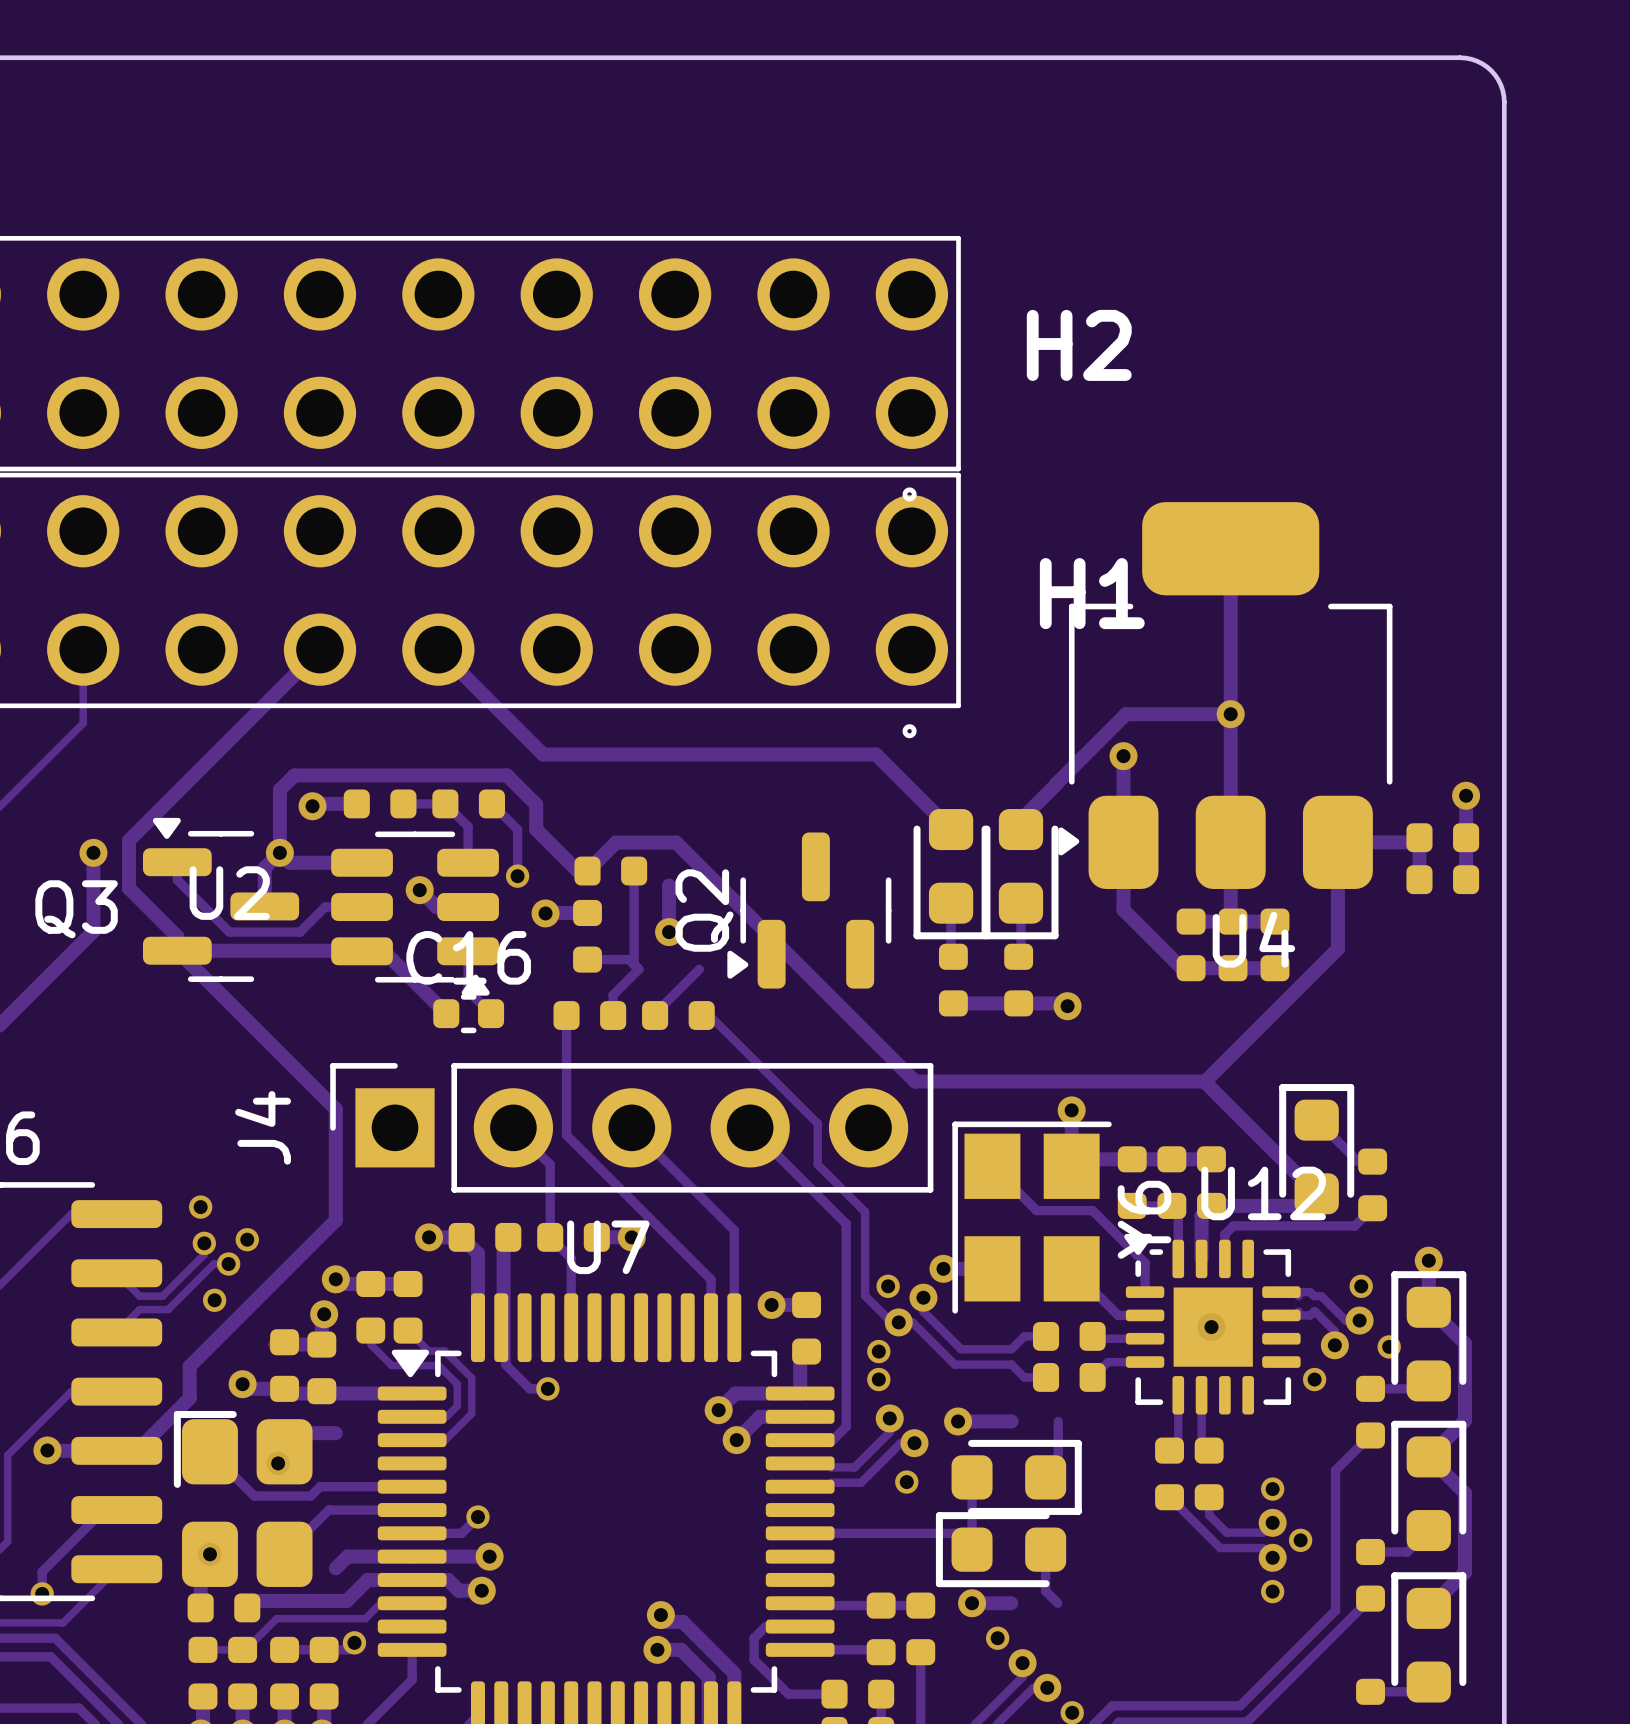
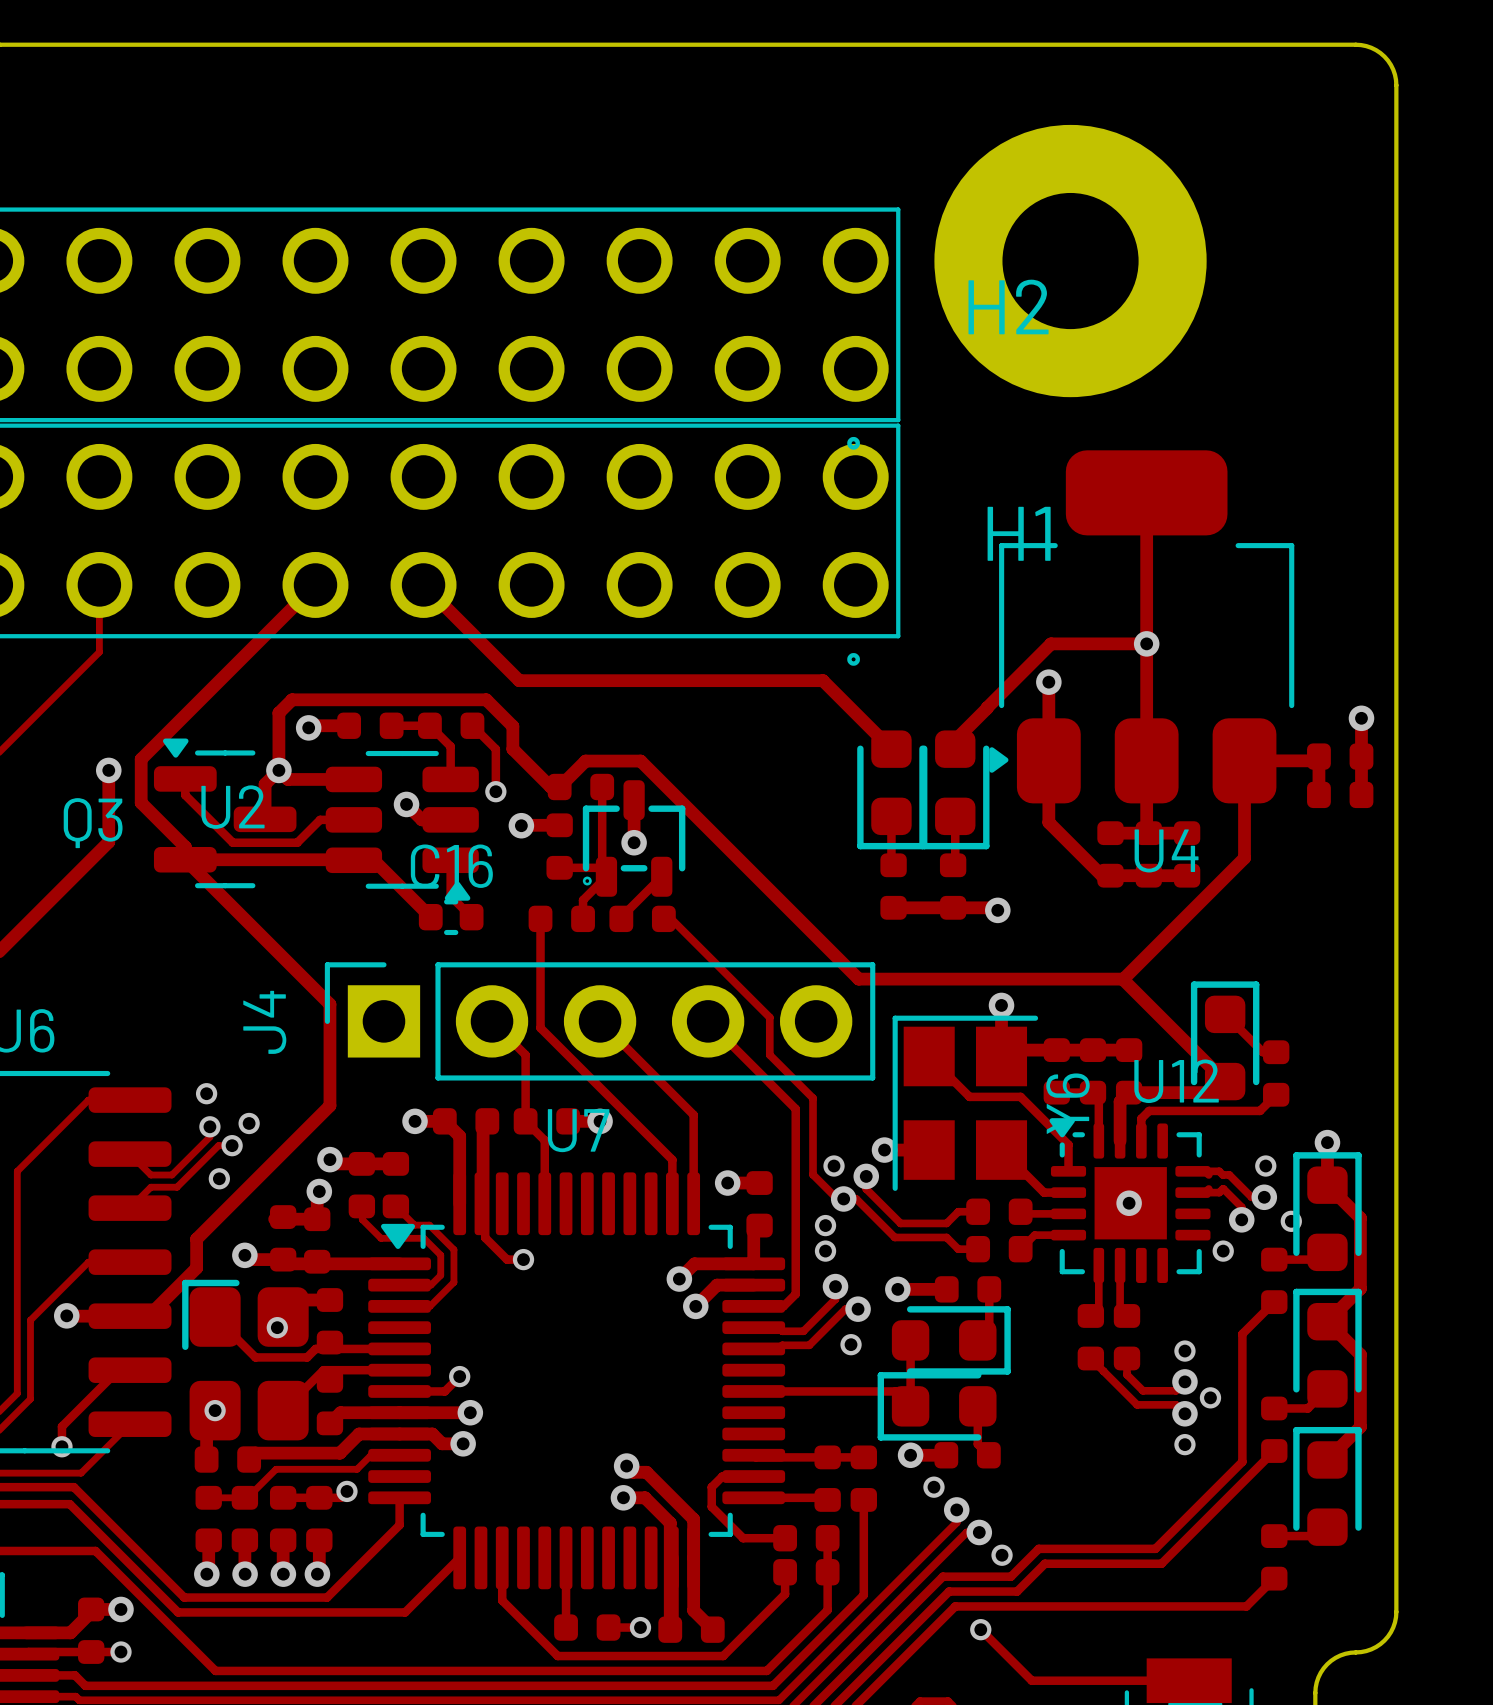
part: none -> (1070, 261)
Q2: (809, 910) -> none
part: none -> (634, 838)
part: none -> (968, 1289)
part: none -> (329, 1321)
part: none -> (329, 1402)
part: none -> (967, 1455)

